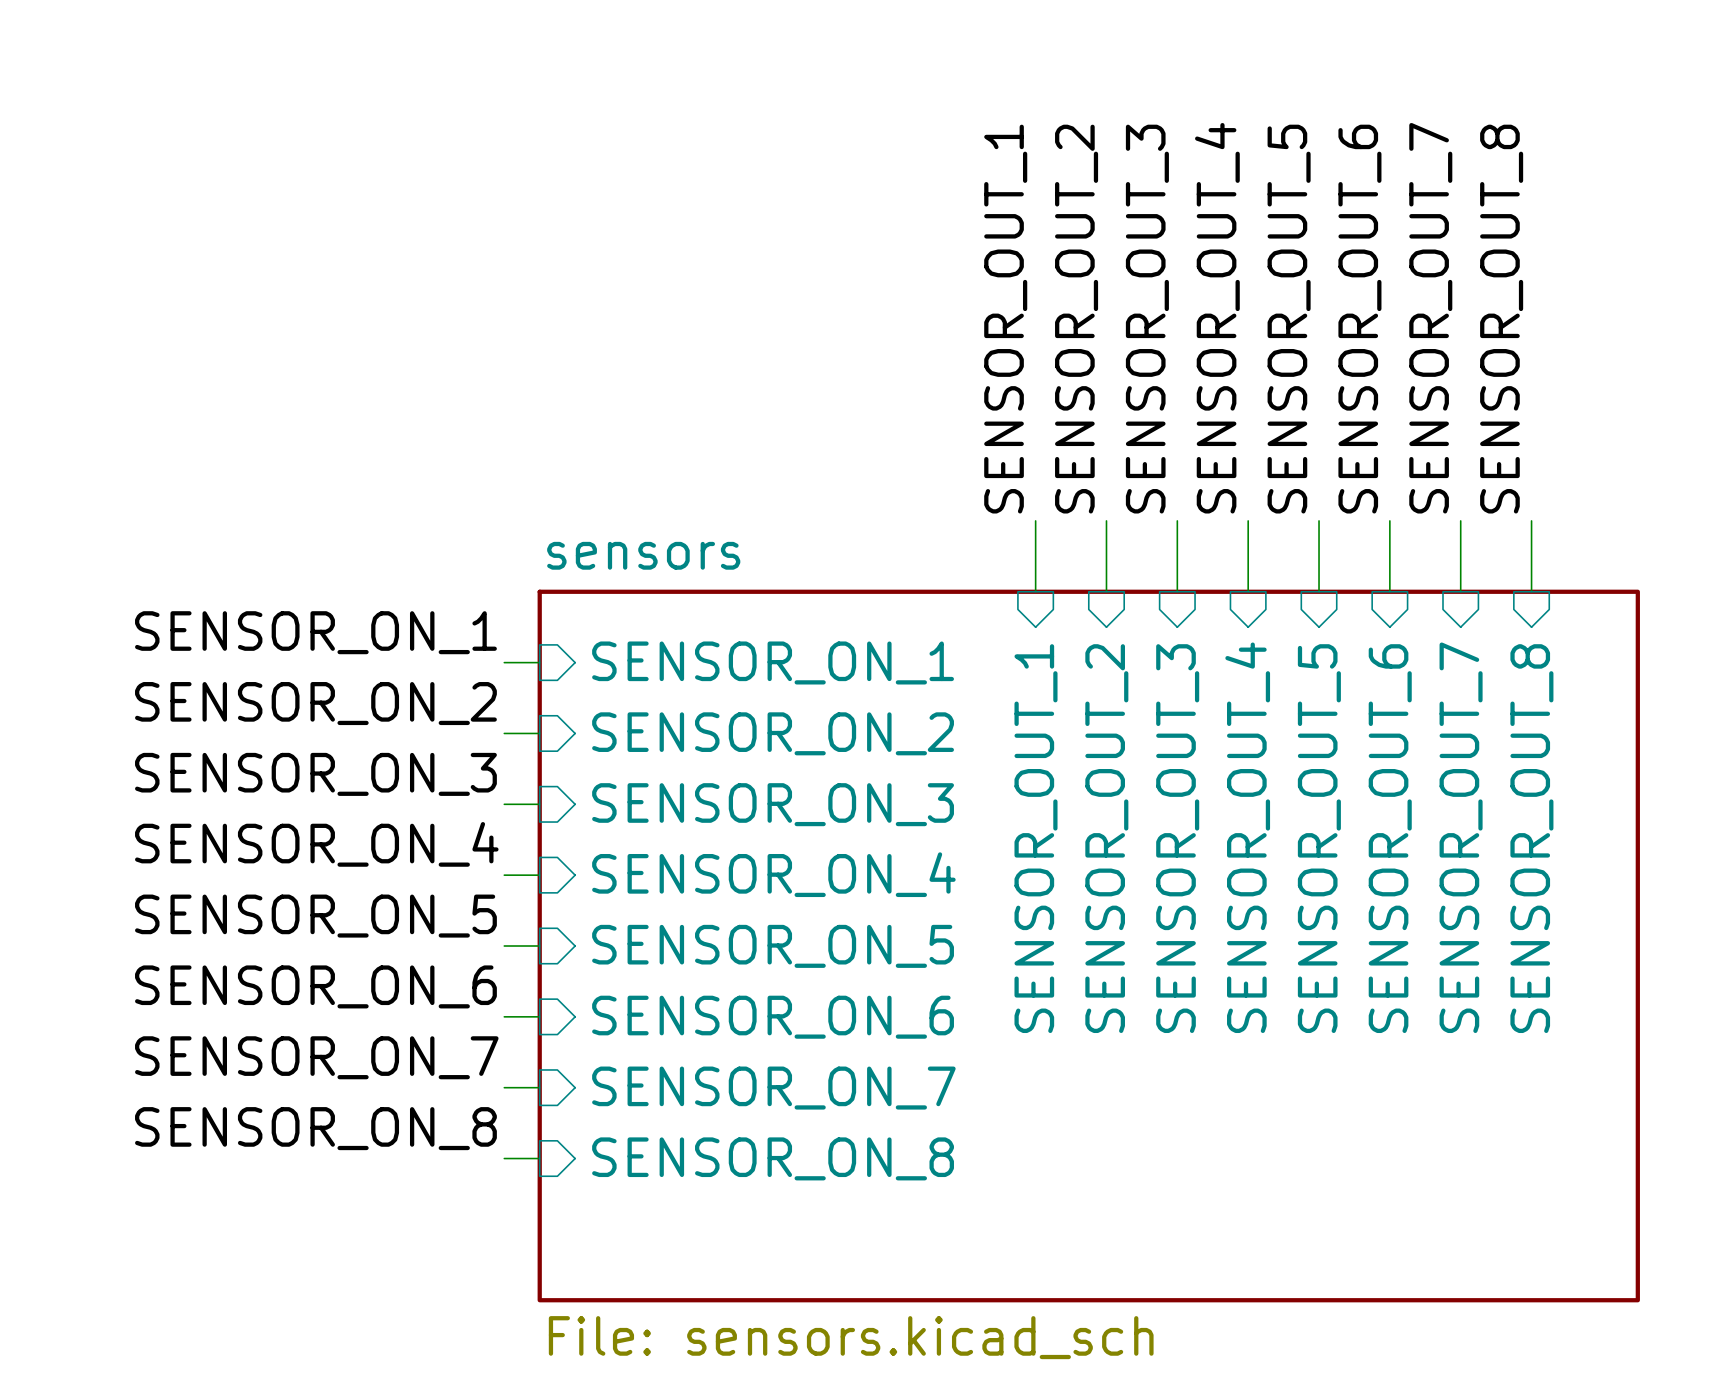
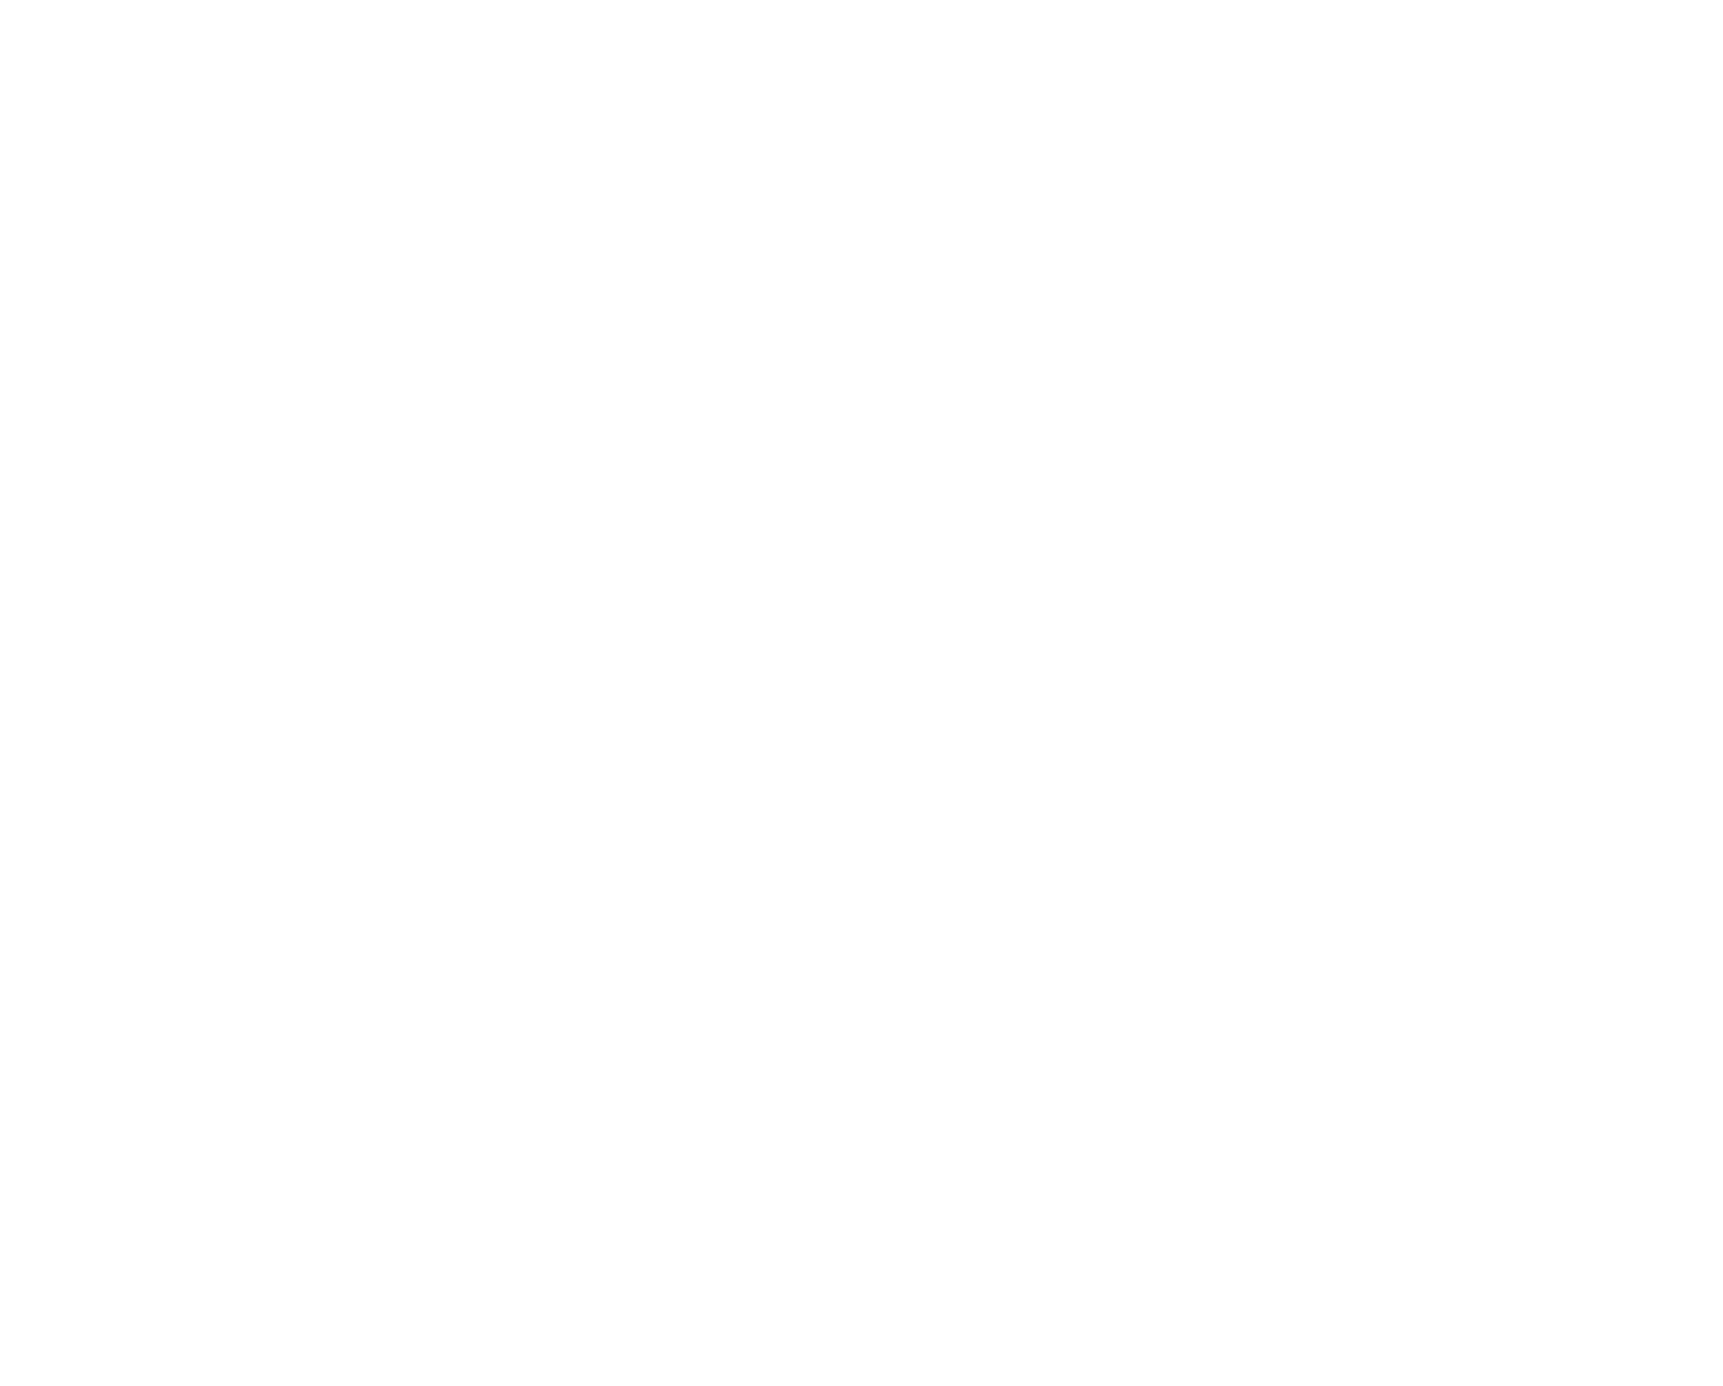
label: SENSOR_OUT_4 (1217, 318) -> none
label: SENSOR_OUT_7 (1430, 318) -> none
label: SENSOR_OUT_1 (1005, 319) -> none
label: SENSOR_OUT_2 (1076, 319) -> none
label: SENSOR_OUT_3 (1147, 319) -> none
label: SENSOR_OUT_5 (1289, 319) -> none
label: SENSOR_OUT_6 (1359, 319) -> none
label: SENSOR_OUT_8 (1501, 319) -> none
wire: (1035, 520) (1035, 591) -> none
wire: (1106, 520) (1106, 591) -> none
wire: (1177, 520) (1177, 591) -> none
wire: (1248, 520) (1248, 591) -> none
wire: (1319, 520) (1319, 591) -> none
wire: (1389, 520) (1389, 591) -> none
wire: (1460, 520) (1460, 591) -> none
wire: (1531, 520) (1531, 591) -> none
label: SENSOR_ON_1 (315, 632) -> none
wire: (504, 662) (539, 662) -> none
sheet pin: SENSOR_ON_1 (773, 662) -> none
label: SENSOR_ON_2 (315, 703) -> none
wire: (504, 733) (539, 733) -> none
sheet pin: SENSOR_ON_2 (773, 733) -> none
label: SENSOR_ON_3 (315, 774) -> none
wire: (504, 804) (539, 804) -> none
sheet pin: SENSOR_ON_3 (773, 804) -> none
sheet pin: SENSOR_OUT_4 (1247, 837) -> none
sheet pin: SENSOR_OUT_7 (1461, 837) -> none
sheet pin: SENSOR_OUT_1 (1036, 838) -> none
sheet pin: SENSOR_OUT_2 (1106, 838) -> none
sheet pin: SENSOR_OUT_3 (1177, 838) -> none
sheet pin: SENSOR_OUT_5 (1319, 838) -> none
sheet pin: SENSOR_OUT_6 (1390, 838) -> none
sheet pin: SENSOR_OUT_8 (1531, 838) -> none
label: SENSOR_ON_4 (316, 844) -> none
sheet pin: SENSOR_ON_4 (773, 874) -> none
wire: (504, 875) (539, 875) -> none
label: SENSOR_ON_5 (315, 916) -> none
wire: (504, 946) (539, 946) -> none
sheet pin: SENSOR_ON_5 (773, 946) -> none
sheet sensors: File: sensors.kicad_sch (1088, 946) -> none
label: SENSOR_ON_6 (315, 986) -> none
wire: (504, 1016) (539, 1016) -> none
sheet pin: SENSOR_ON_6 (773, 1017) -> none
label: SENSOR_ON_7 (316, 1057) -> none
wire: (504, 1087) (539, 1087) -> none
sheet pin: SENSOR_ON_7 (773, 1088) -> none
label: SENSOR_ON_8 (315, 1128) -> none
wire: (504, 1158) (539, 1158) -> none
sheet pin: SENSOR_ON_8 (773, 1158) -> none

